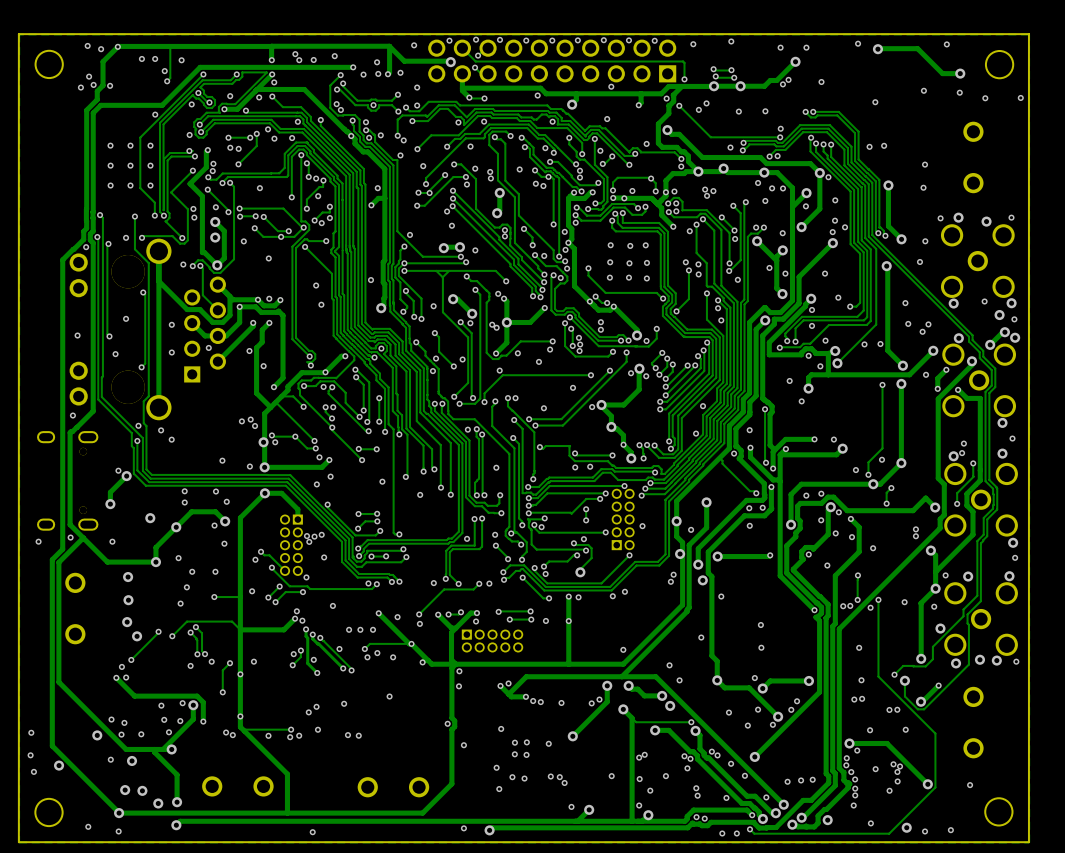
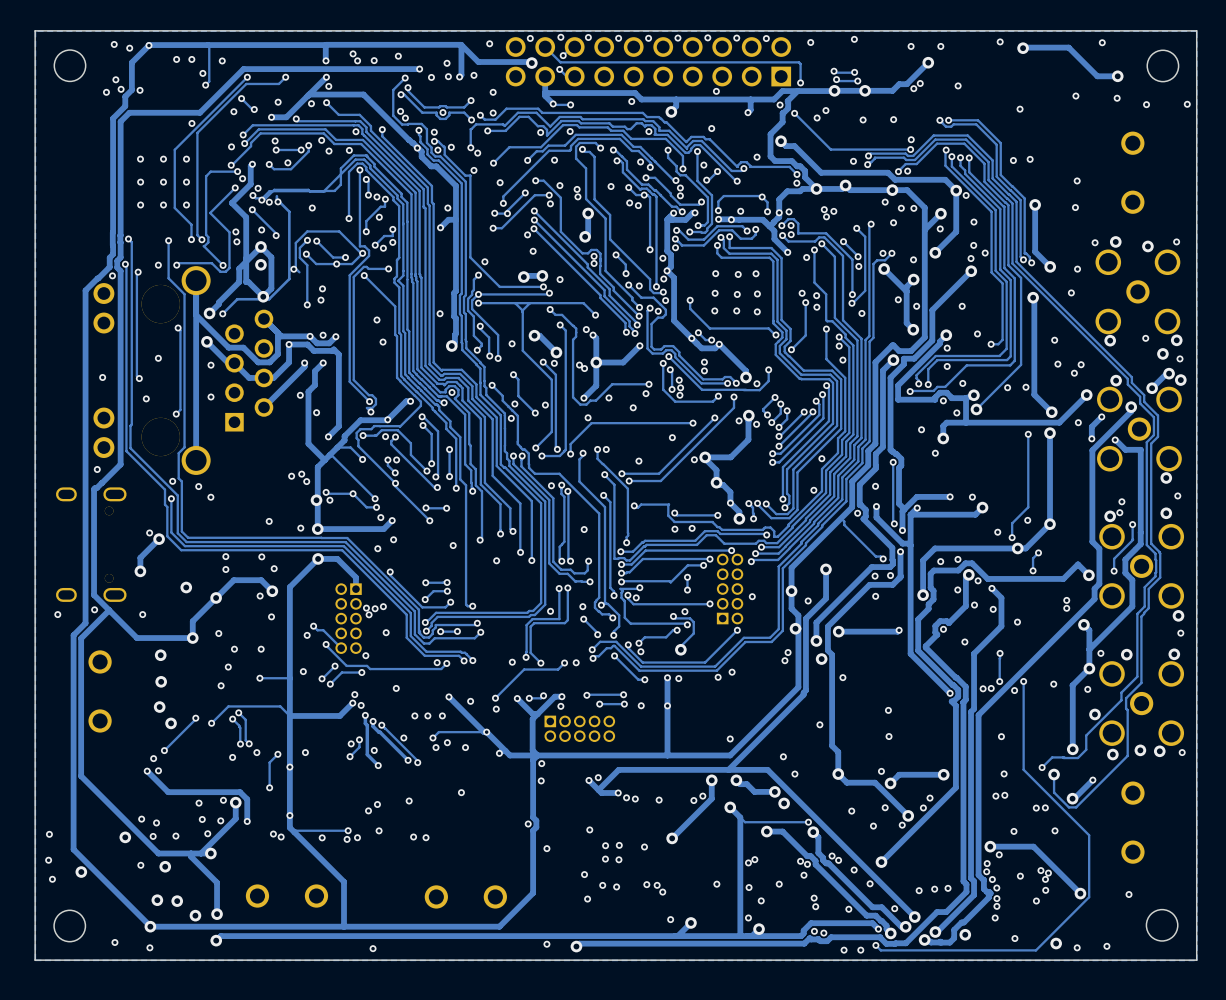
via: none -> (275, 141)
track: (203, 137) (198, 137) (195, 134) (194, 122) (206, 112) (220, 112) (218, 106) (222, 103) (235, 104) (266, 72) (242, 72) (242, 76) (232, 83) (204, 83) (200, 87) (207, 96) (211, 96) (215, 100) (215, 104) (211, 108) (207, 108) (192, 95) (163, 124) (163, 210) (164, 159) (170, 153) (190, 153) (192, 150) (190, 150) -> (247, 149) (231, 165)
track: (256, 139) (256, 146) (238, 164) -> (308, 151) (291, 169) (274, 169) (269, 164)
via: (230, 147) -> none
via: none -> (269, 164)
track: (288, 155) (286, 177) (228, 177) (222, 183) -> (344, 170) (323, 191) (274, 189) (261, 200)
via: none -> (242, 178)
via: (213, 163) -> none
via: (238, 164) -> none
track: none -> (276, 196) (276, 199) (289, 211) (289, 278) (269, 299) (237, 299) (222, 313)
via: none -> (261, 200)
track: (230, 182) (234, 186) (234, 259) (220, 272) (214, 272) (202, 260) (198, 260) (192, 266) -> none
via: (239, 208) -> none
track: (255, 208) (239, 208) -> (307, 231) (295, 242) (295, 268) (299, 272)
via: (240, 216) -> none
track: (255, 216) (240, 216) -> (307, 240) (299, 247) (299, 257) (307, 265) (307, 304)
track: none -> (260, 246) (239, 268) (239, 282) (209, 313)
via: (183, 264) -> none
track: (200, 265) (202, 268) (202, 295) (217, 310) -> none
via: (200, 265) -> none
via: (192, 266) -> none
via: none -> (321, 300)
via: none -> (307, 304)
via: none -> (209, 313)
via: none -> (222, 313)
track: none -> (206, 341) (228, 363) (234, 363)
via: none -> (206, 341)
via: (208, 347) -> none

